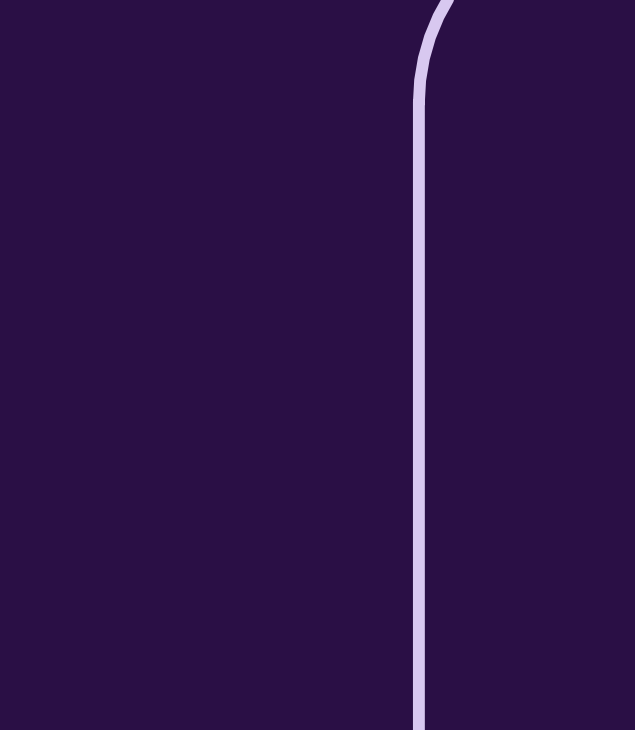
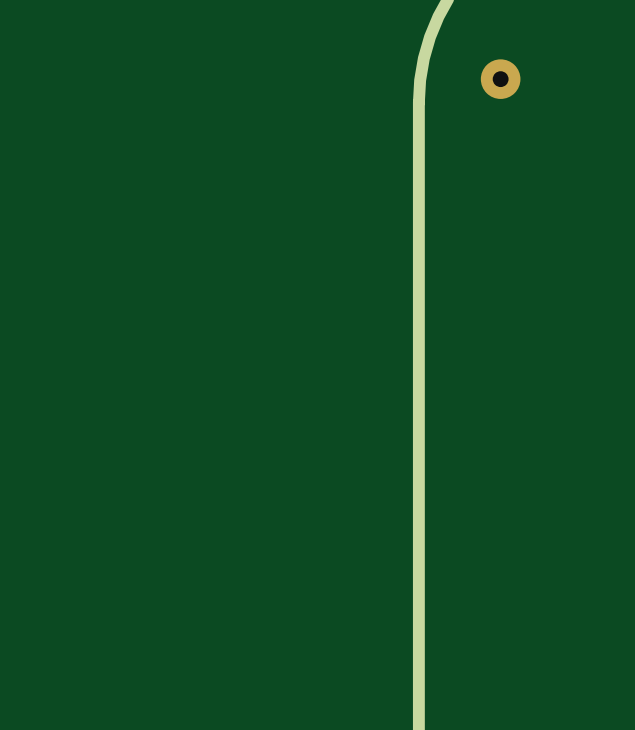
via: none -> (500, 79)

